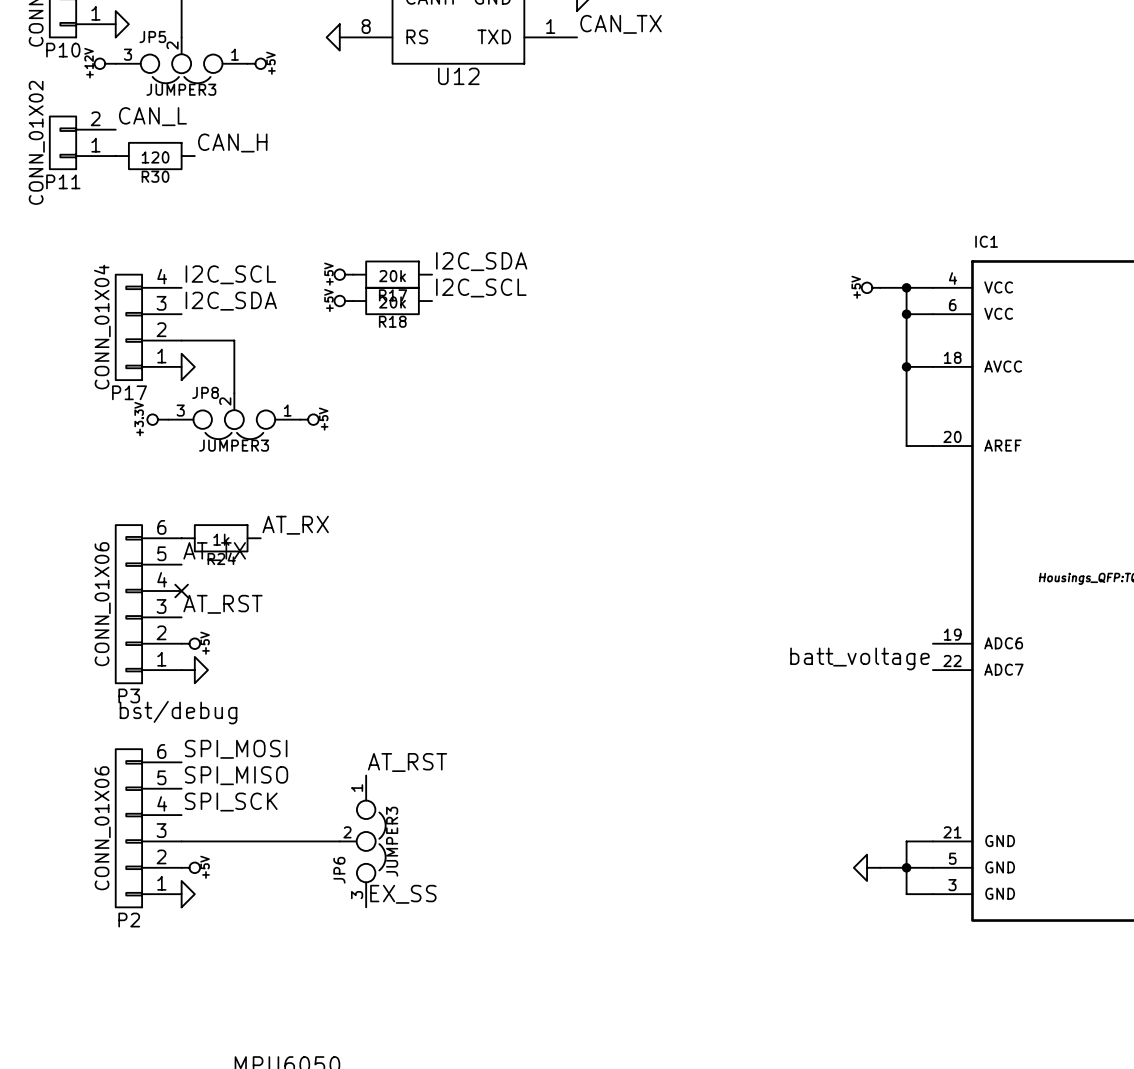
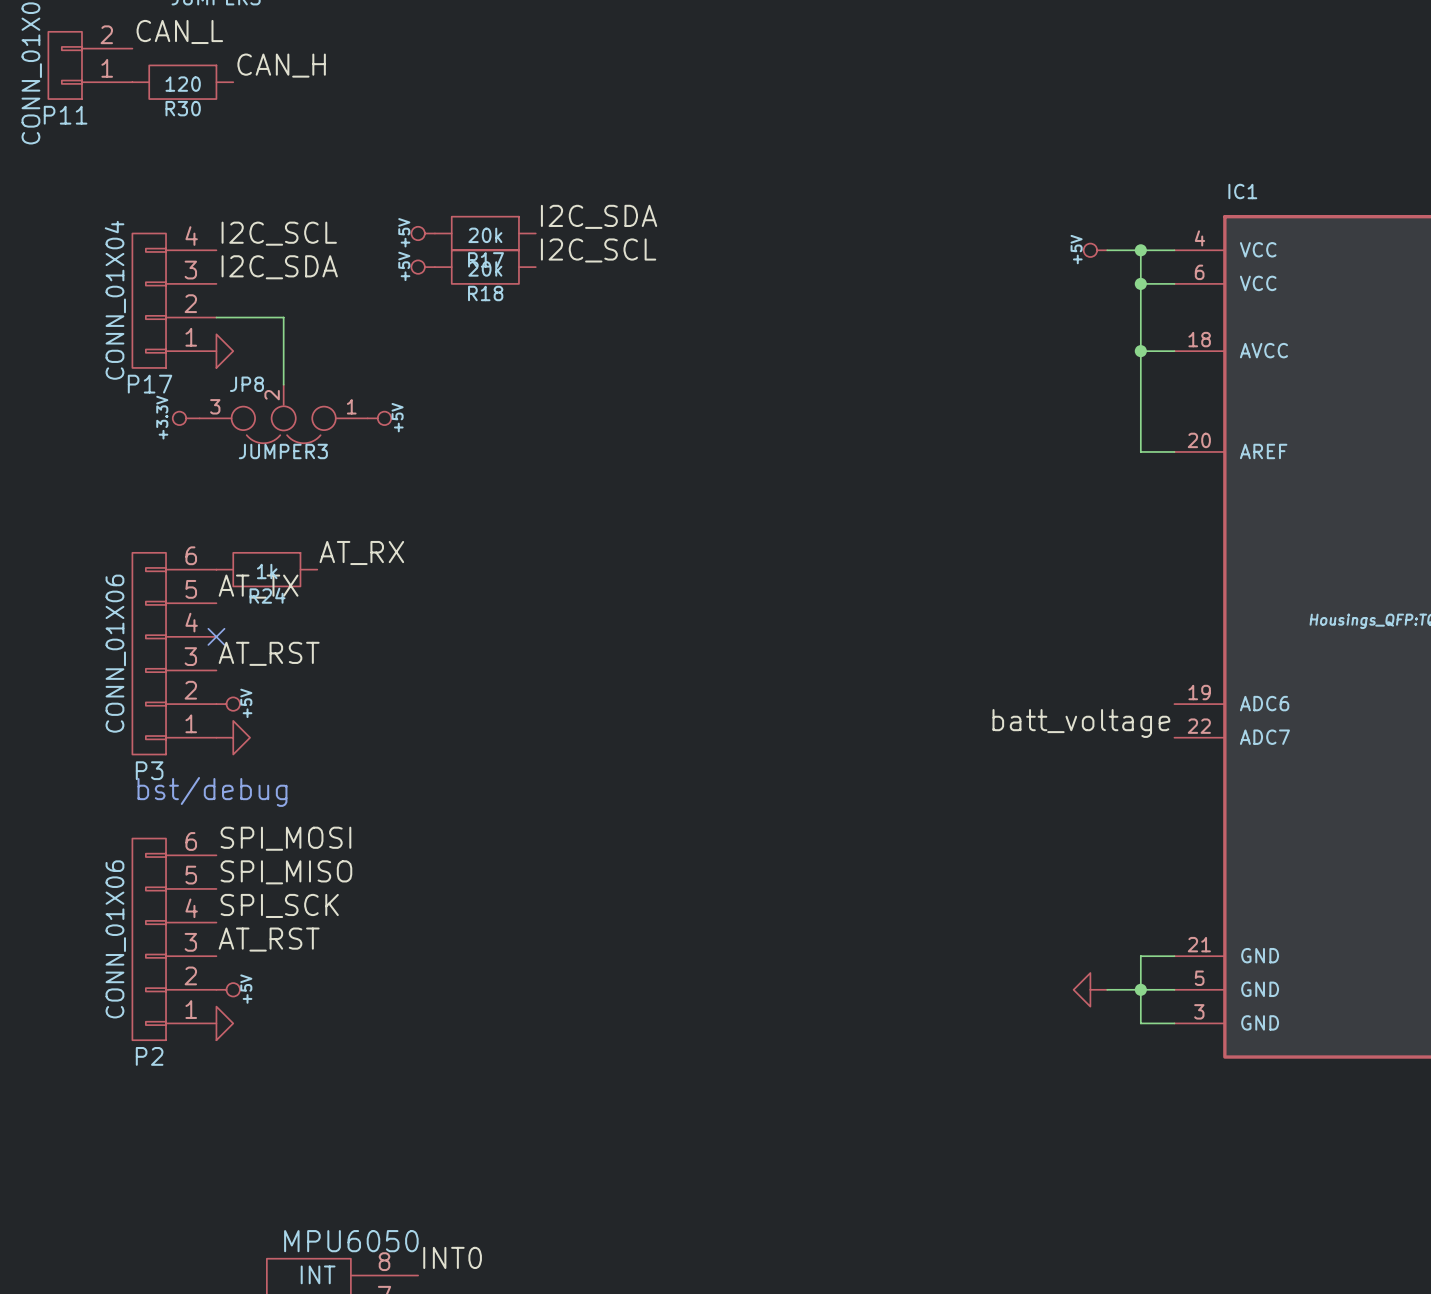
label position: AT_RST (407, 762) -> AT_RST (269, 939)
wire: (181, 841) (339, 841) -> none
JP6: JUMPER3 (362, 841) -> none
label: EX_SS (403, 894) -> none

